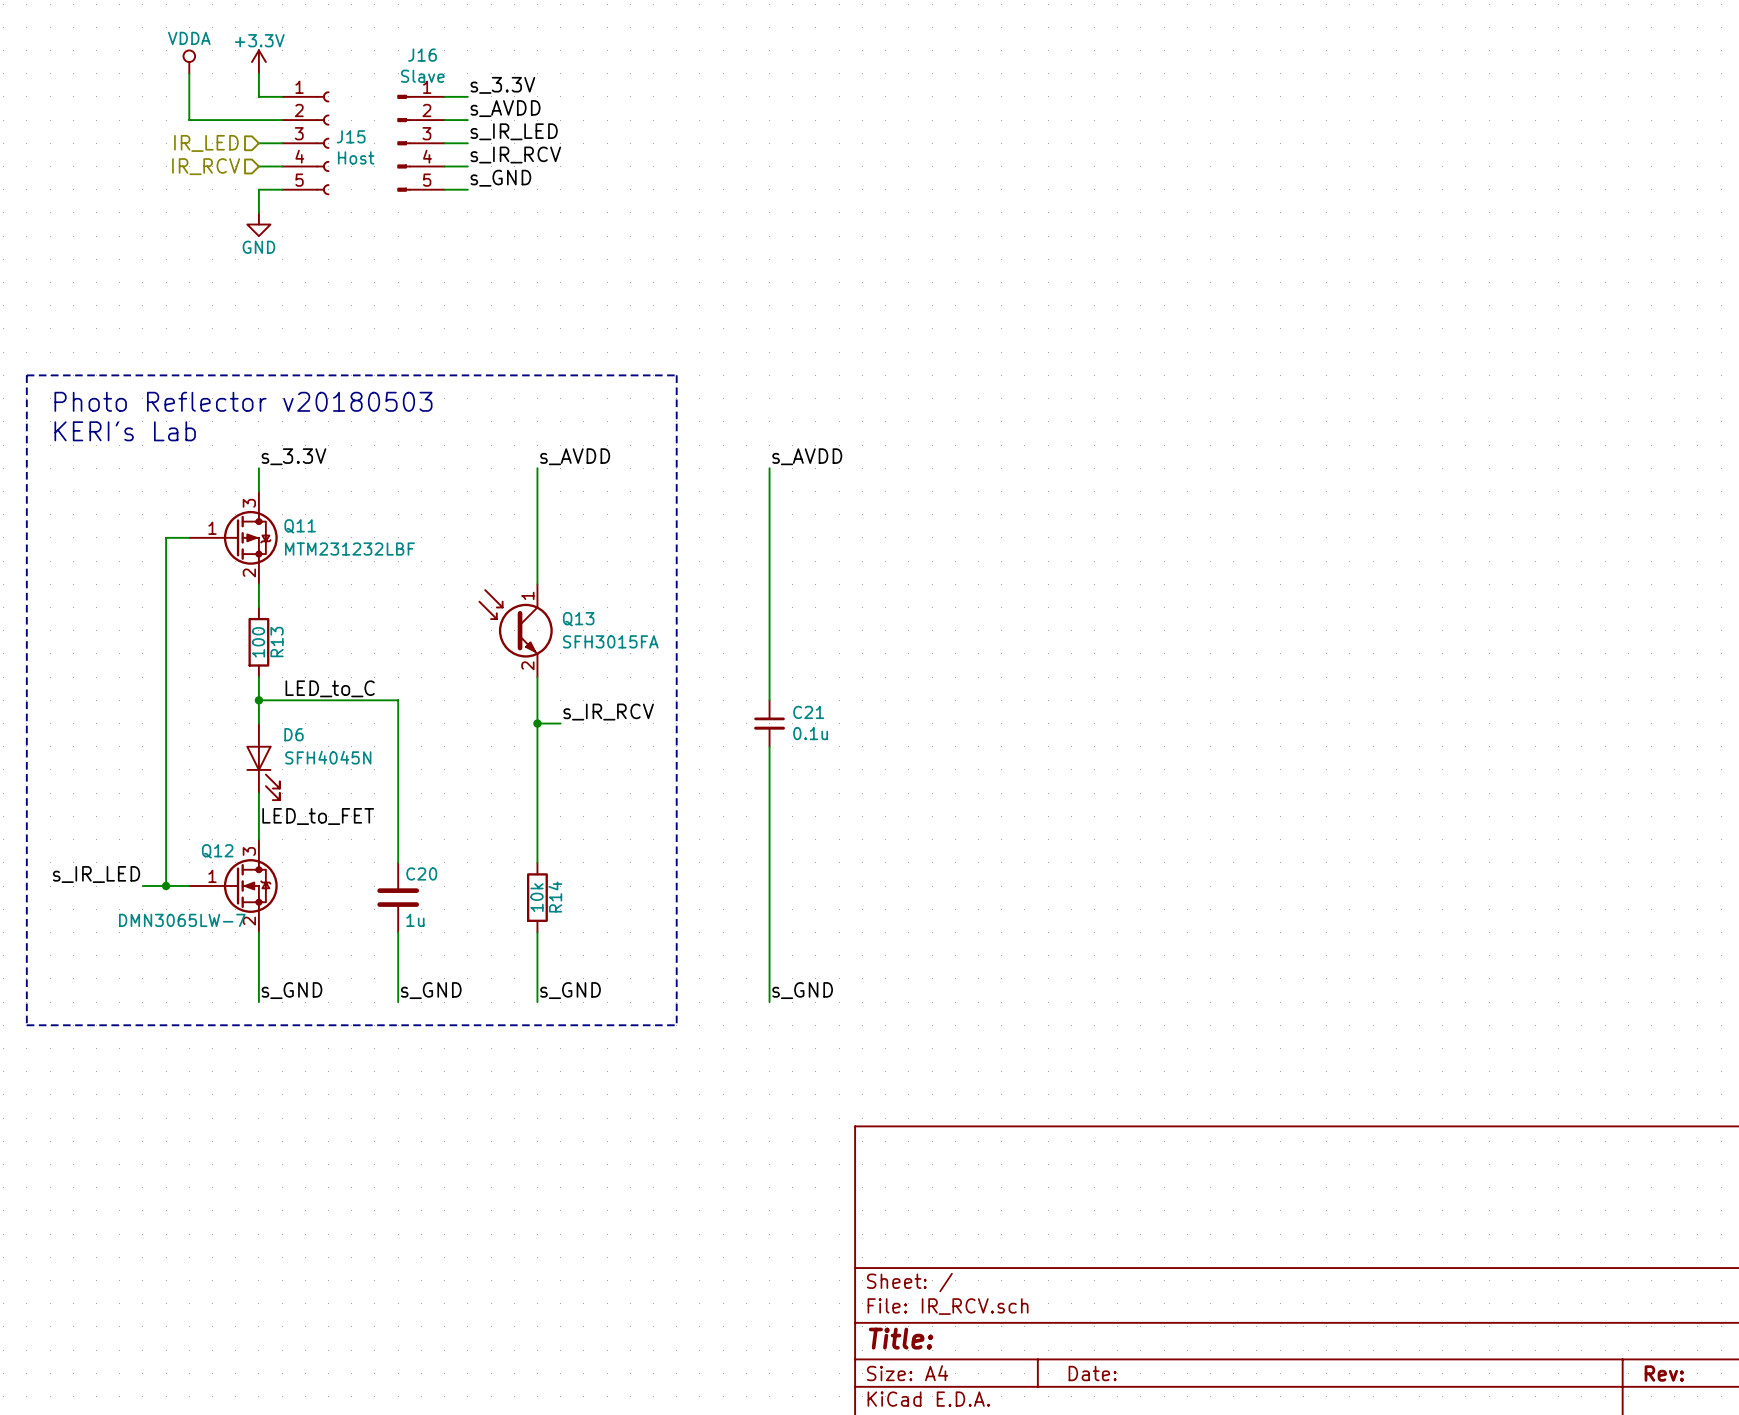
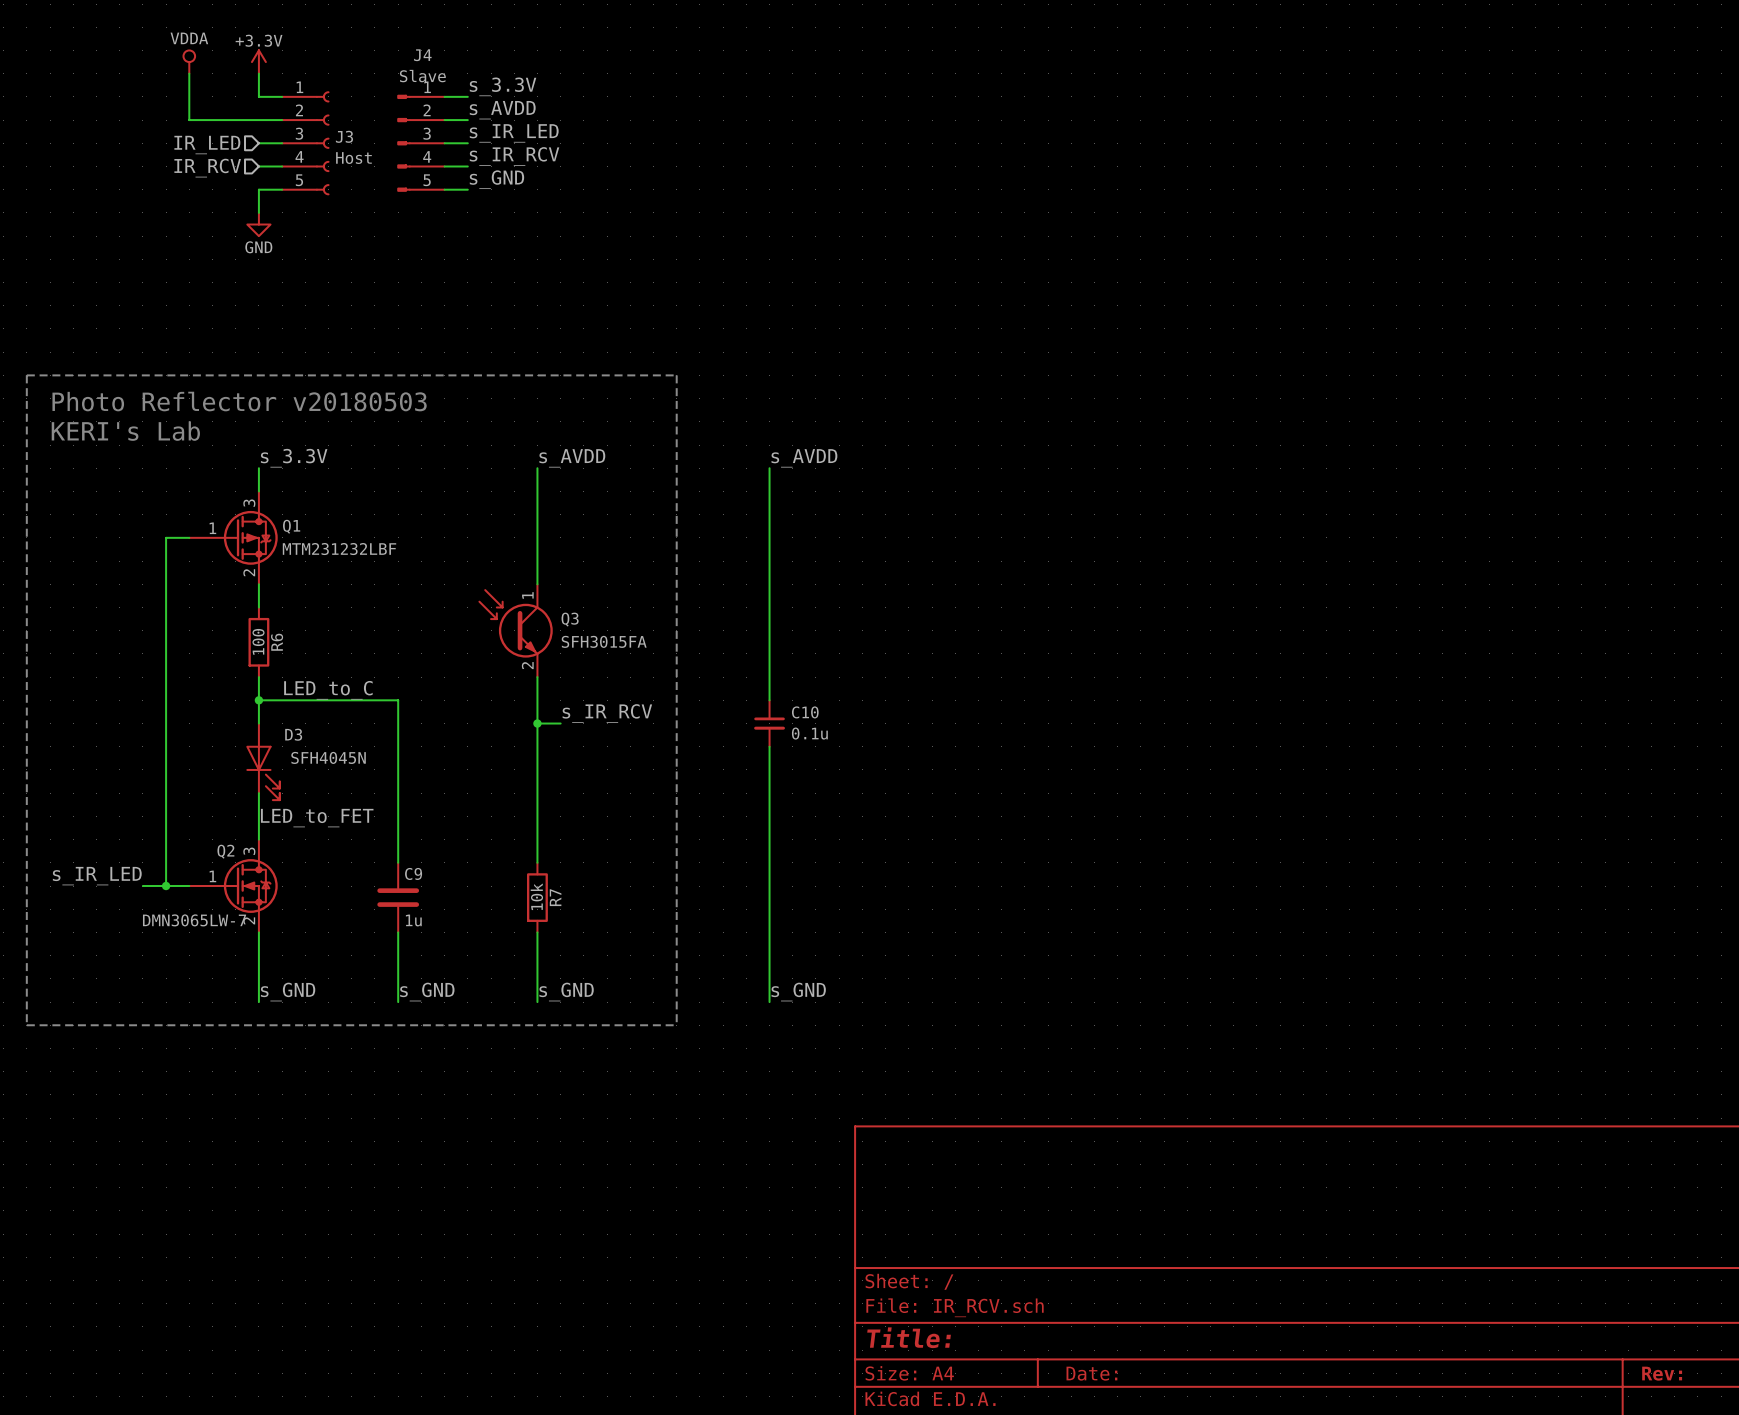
J16 name: J16 (422, 55) -> J4 (422, 55)
J15 name: J15 (351, 136) -> J3 (344, 136)
Q11 name: Q11 (300, 526) -> Q1 (291, 526)
Q13 name: Q13 (578, 619) -> Q3 (570, 619)
R13 name: R13 (277, 642) -> R6 (277, 642)
C21 name: C21 (808, 712) -> C10 (805, 712)
D6 name: D6 (294, 734) -> D3 (293, 734)
Q12 name: Q12 (217, 851) -> Q2 (225, 851)
C20 name: C20 (421, 873) -> C9 (413, 873)
R14 name: R14 (555, 897) -> R7 (555, 897)

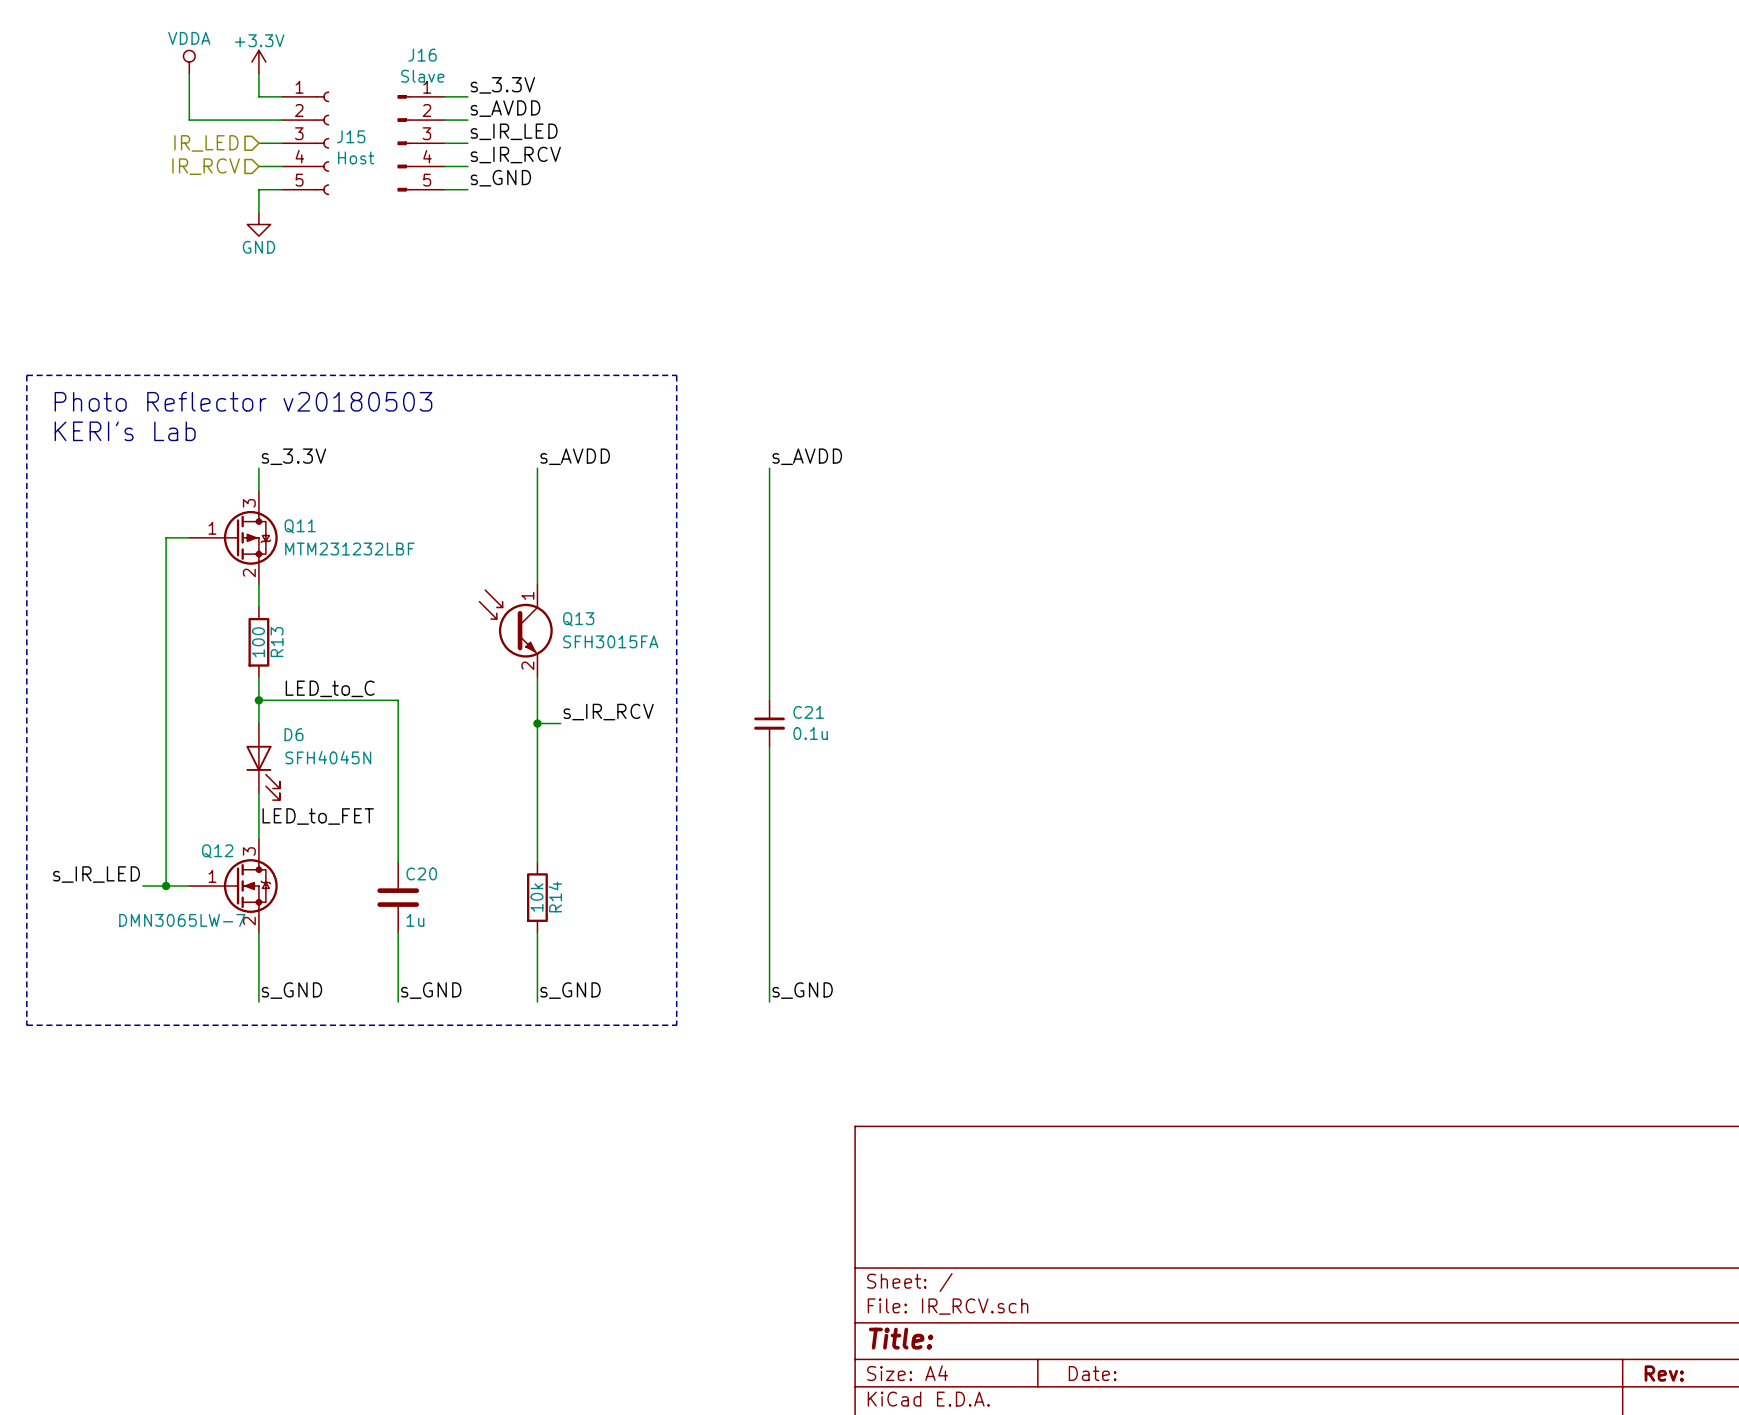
J4 name: J4 (422, 55) -> J16 (422, 55)
J3 name: J3 (344, 136) -> J15 (351, 136)
Q1 name: Q1 (291, 526) -> Q11 (300, 526)
Q3 name: Q3 (570, 619) -> Q13 (578, 619)
R6 name: R6 (277, 642) -> R13 (277, 642)
C10 name: C10 (805, 712) -> C21 (808, 712)
D3 name: D3 (293, 734) -> D6 (294, 734)
Q2 name: Q2 (225, 851) -> Q12 (217, 851)
C9 name: C9 (413, 873) -> C20 (421, 873)
R7 name: R7 (555, 897) -> R14 (555, 897)

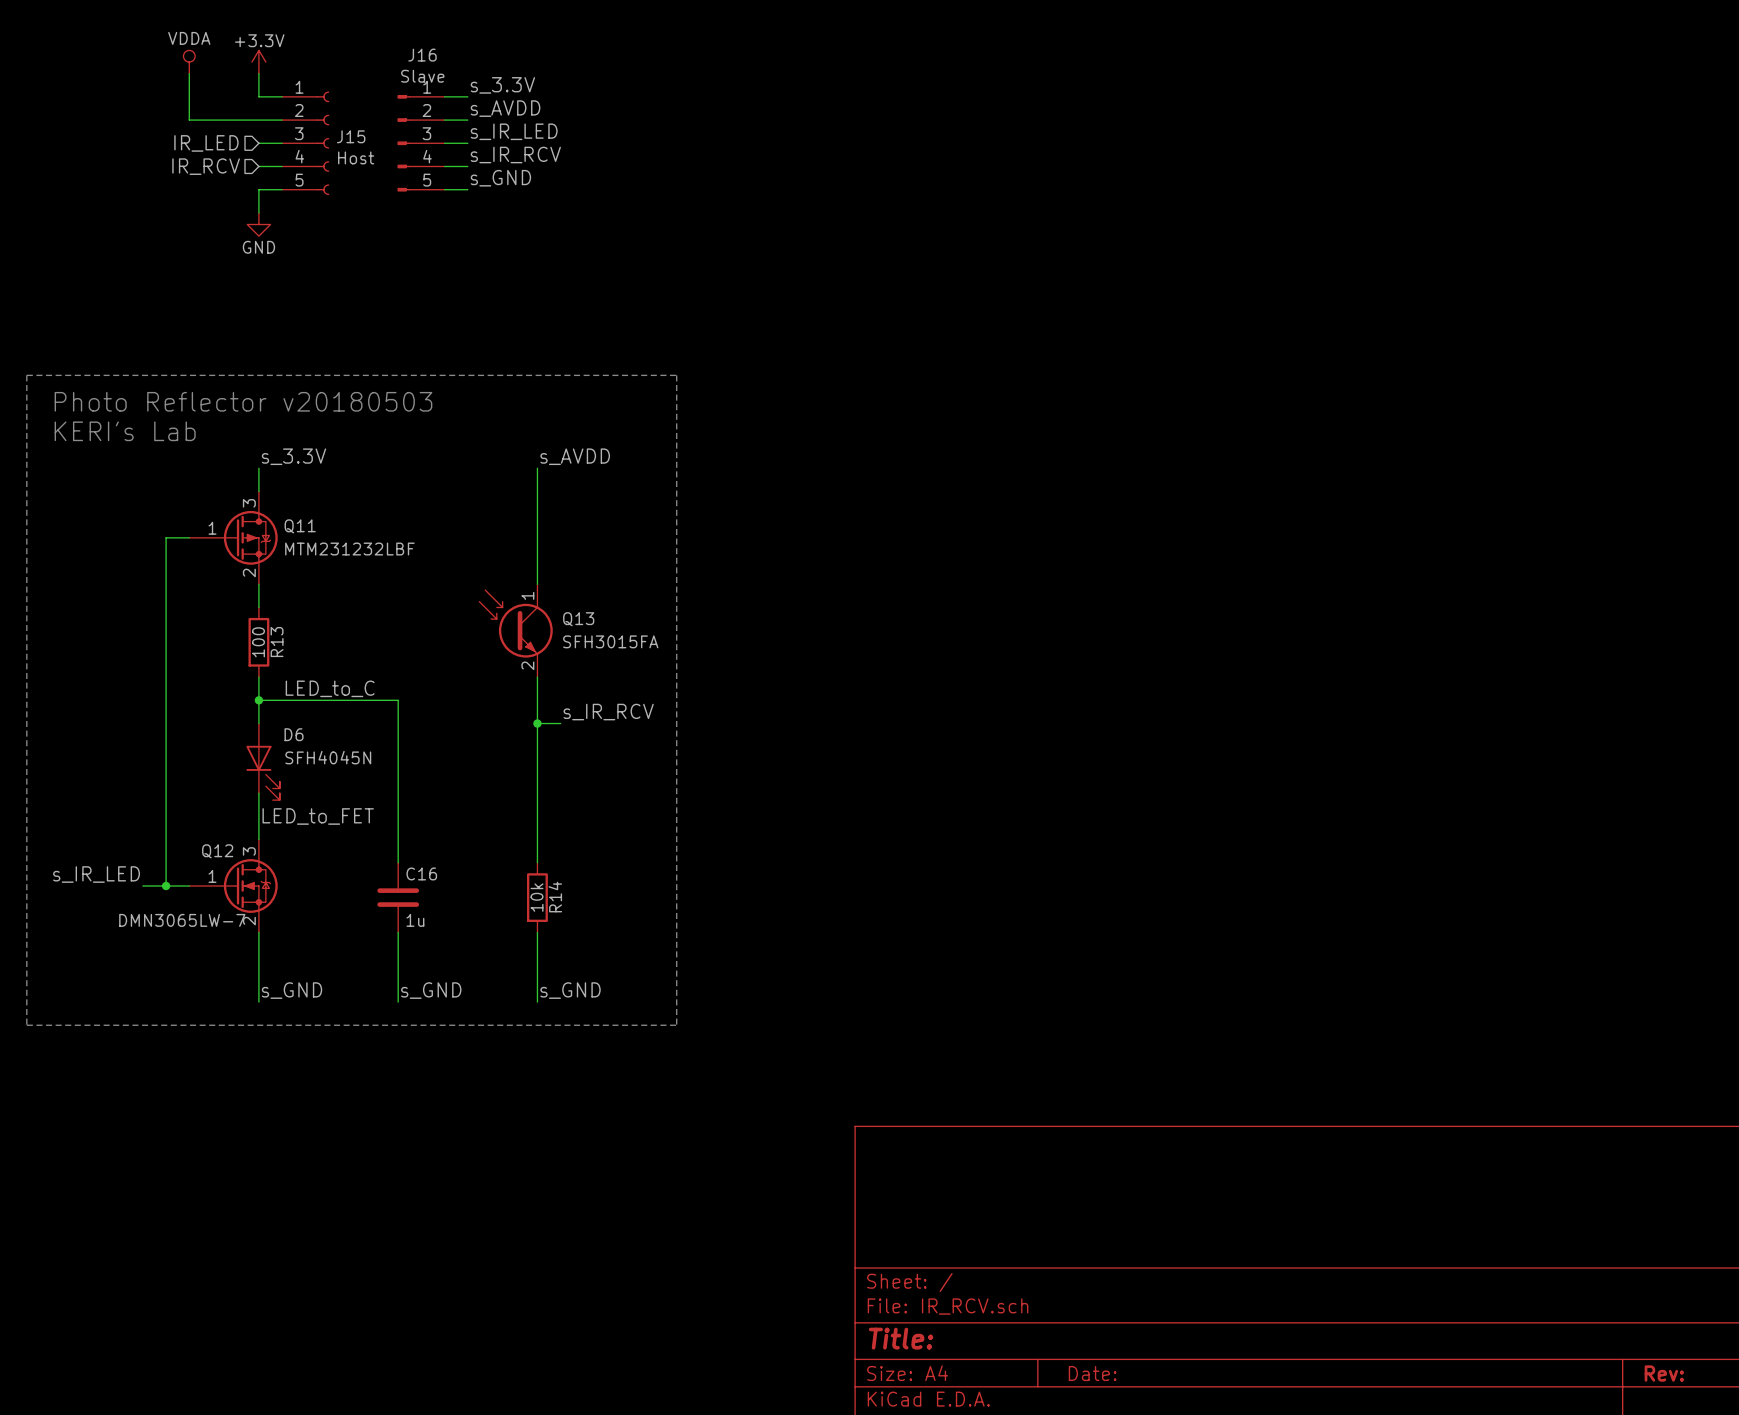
label: s_AVDD (807, 456) -> none
wire: (769, 468) (769, 700) -> none
C21: 0.1u (769, 723) -> none
wire: (769, 746) (769, 1002) -> none
C20 name: C20 (421, 873) -> C16 (421, 873)
label: s_GND (802, 990) -> none

